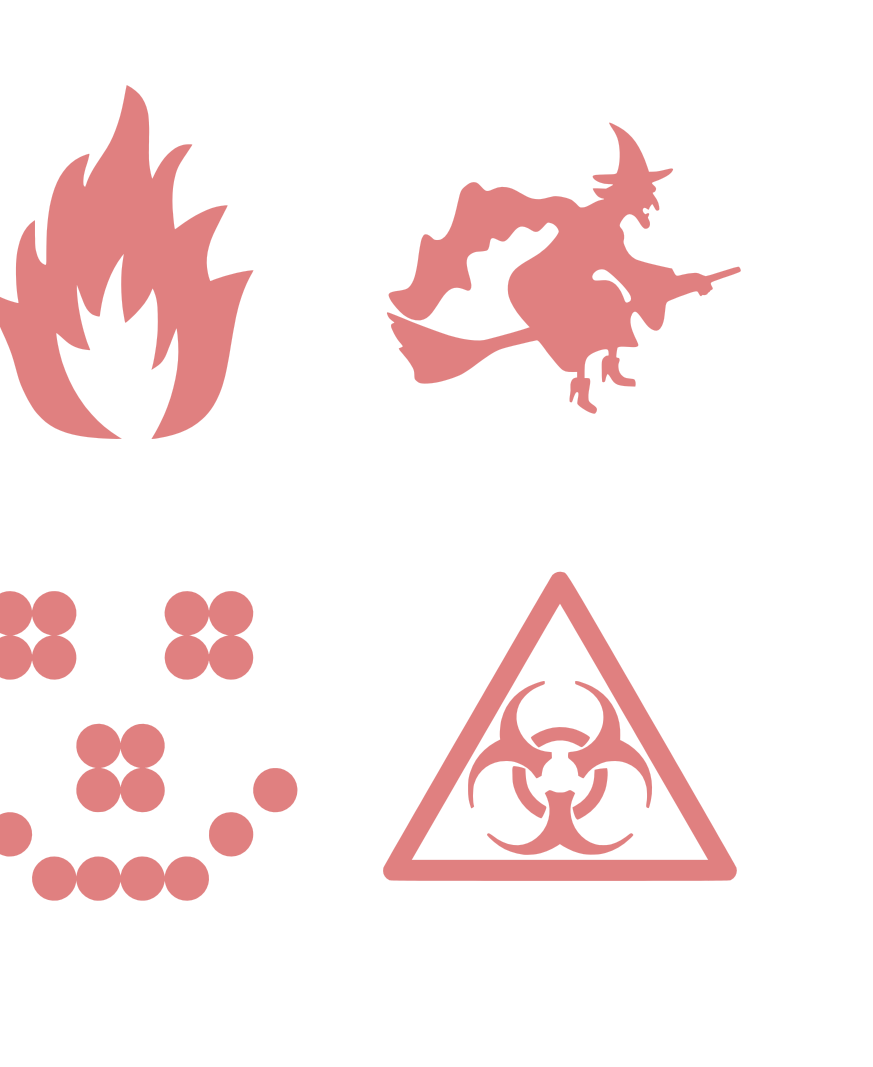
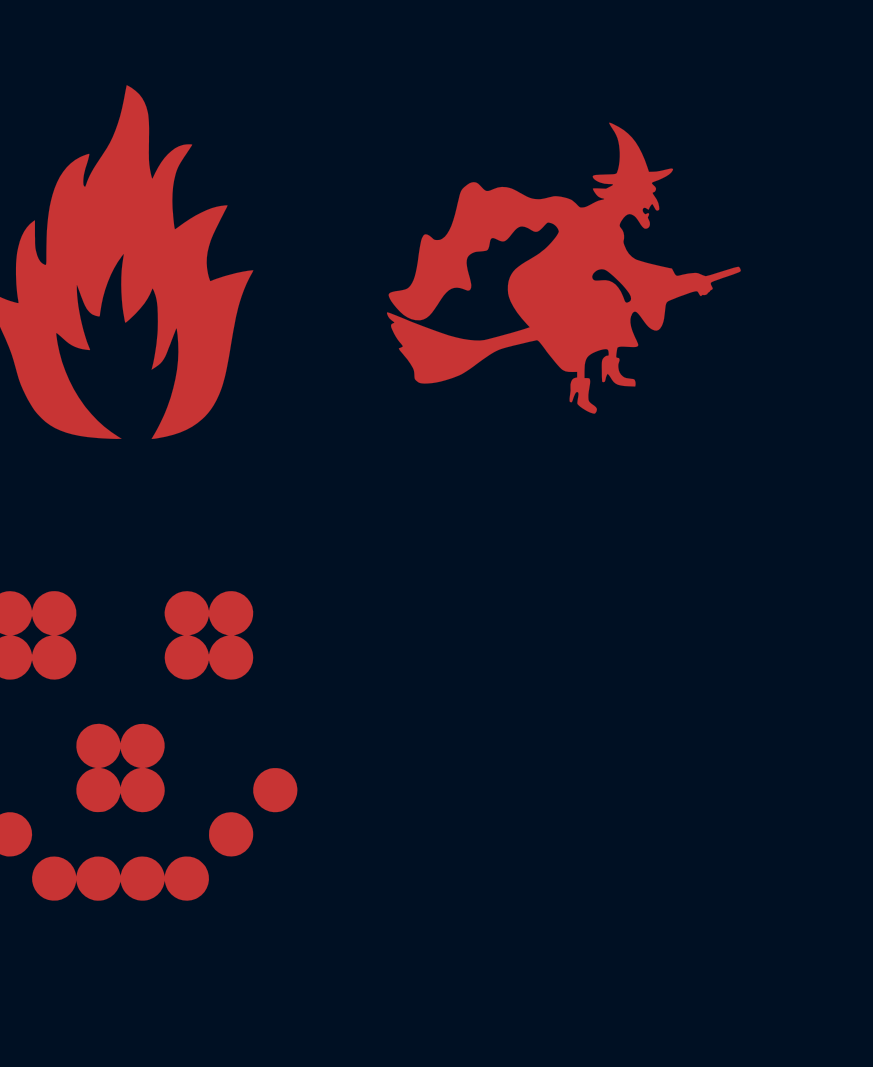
drawing: [383, 571, 737, 881] -> none

